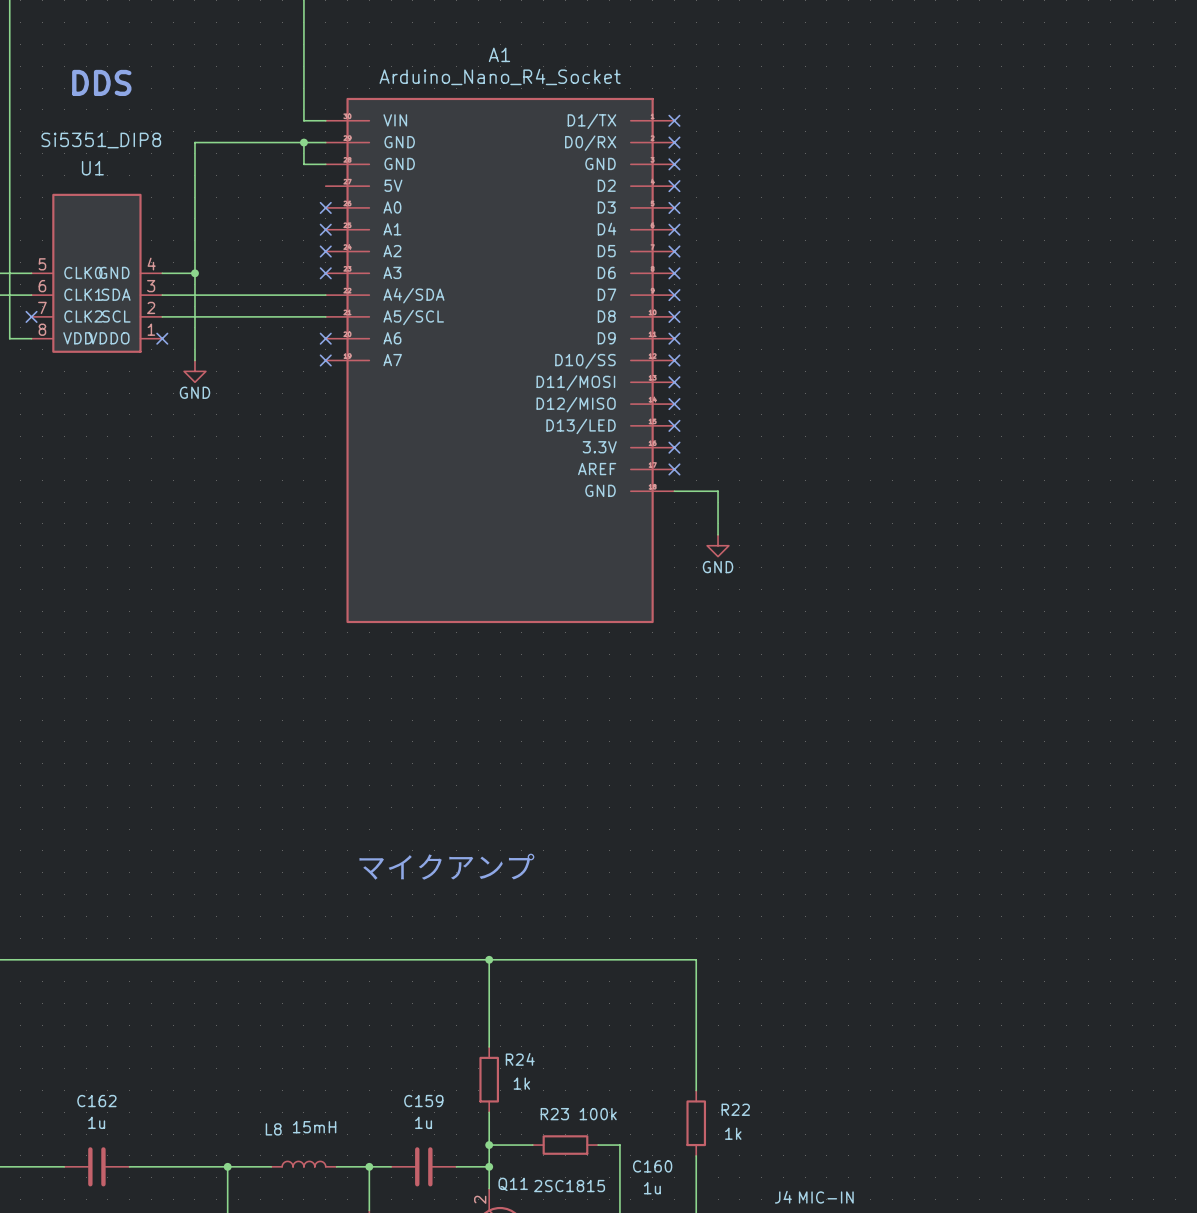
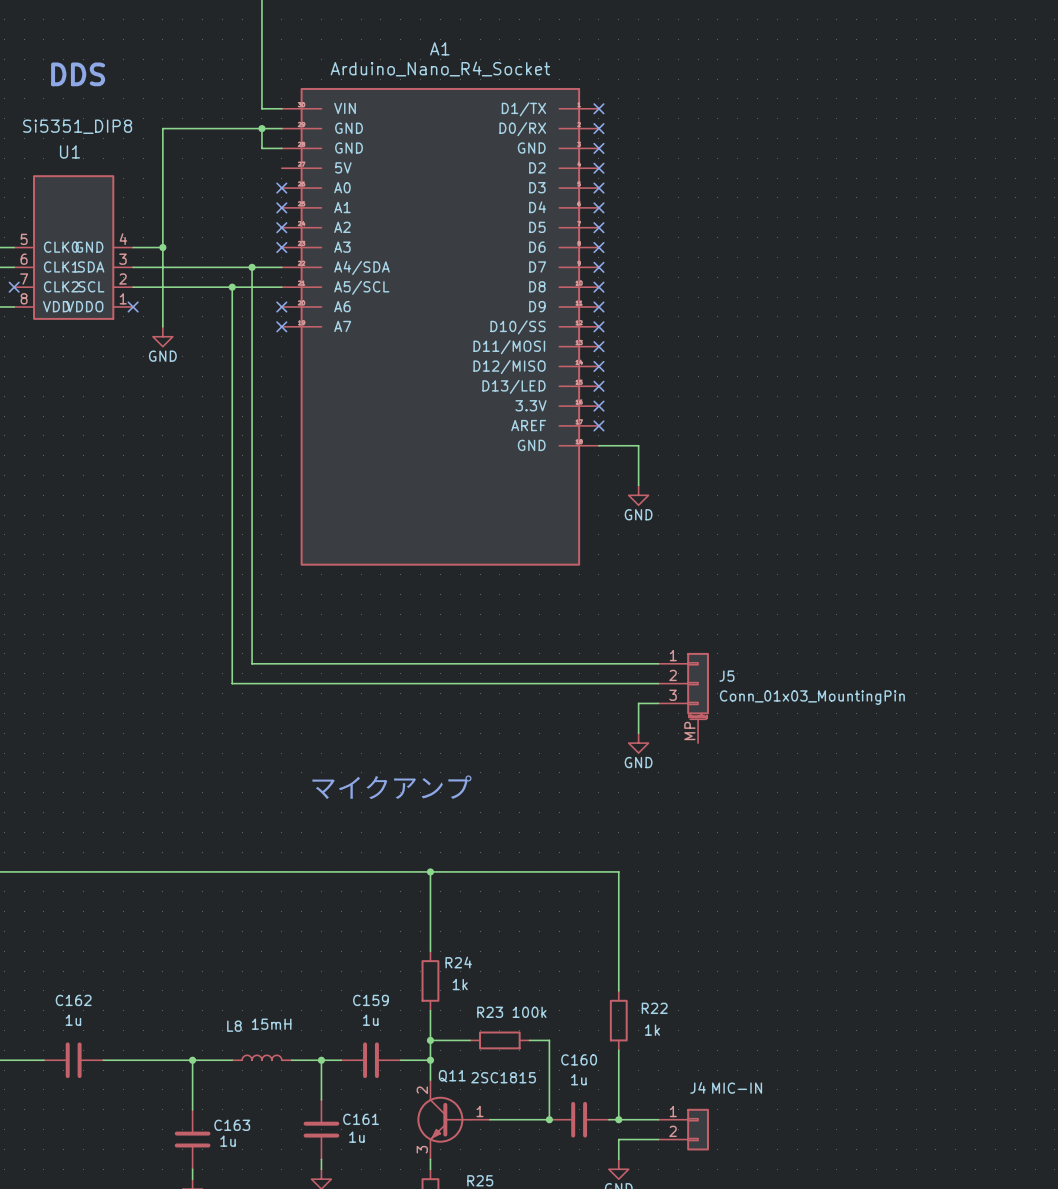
wire: none -> (252, 267) (252, 663) (658, 663)
junction: none -> (252, 267)
wire: none -> (232, 287) (232, 683) (658, 683)
junction: none -> (232, 287)
J5: none -> Conn_01x03_MountingPin (683, 698)
wire: none -> (658, 703) (638, 703) (638, 733)
power symbol: none -> GND (638, 743)

